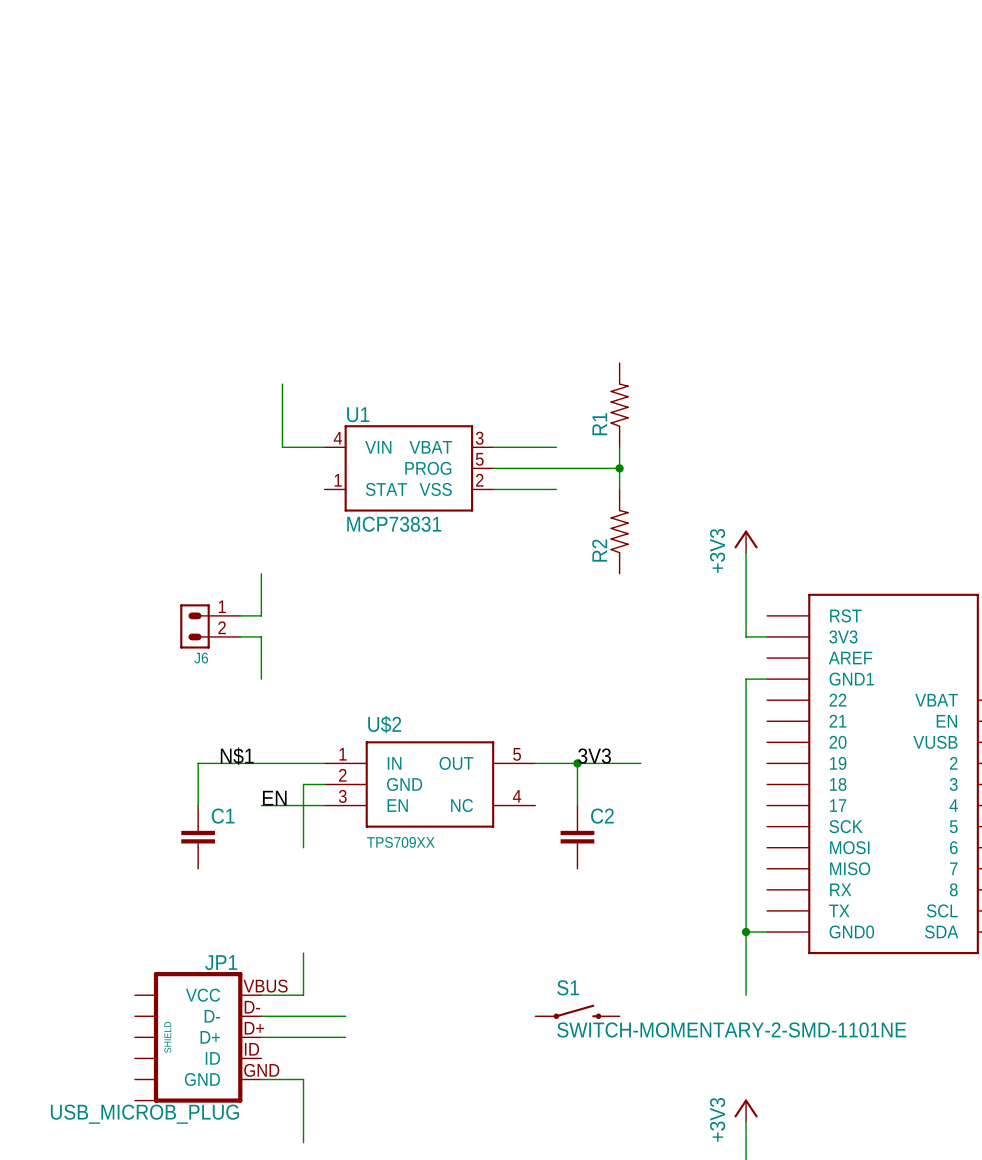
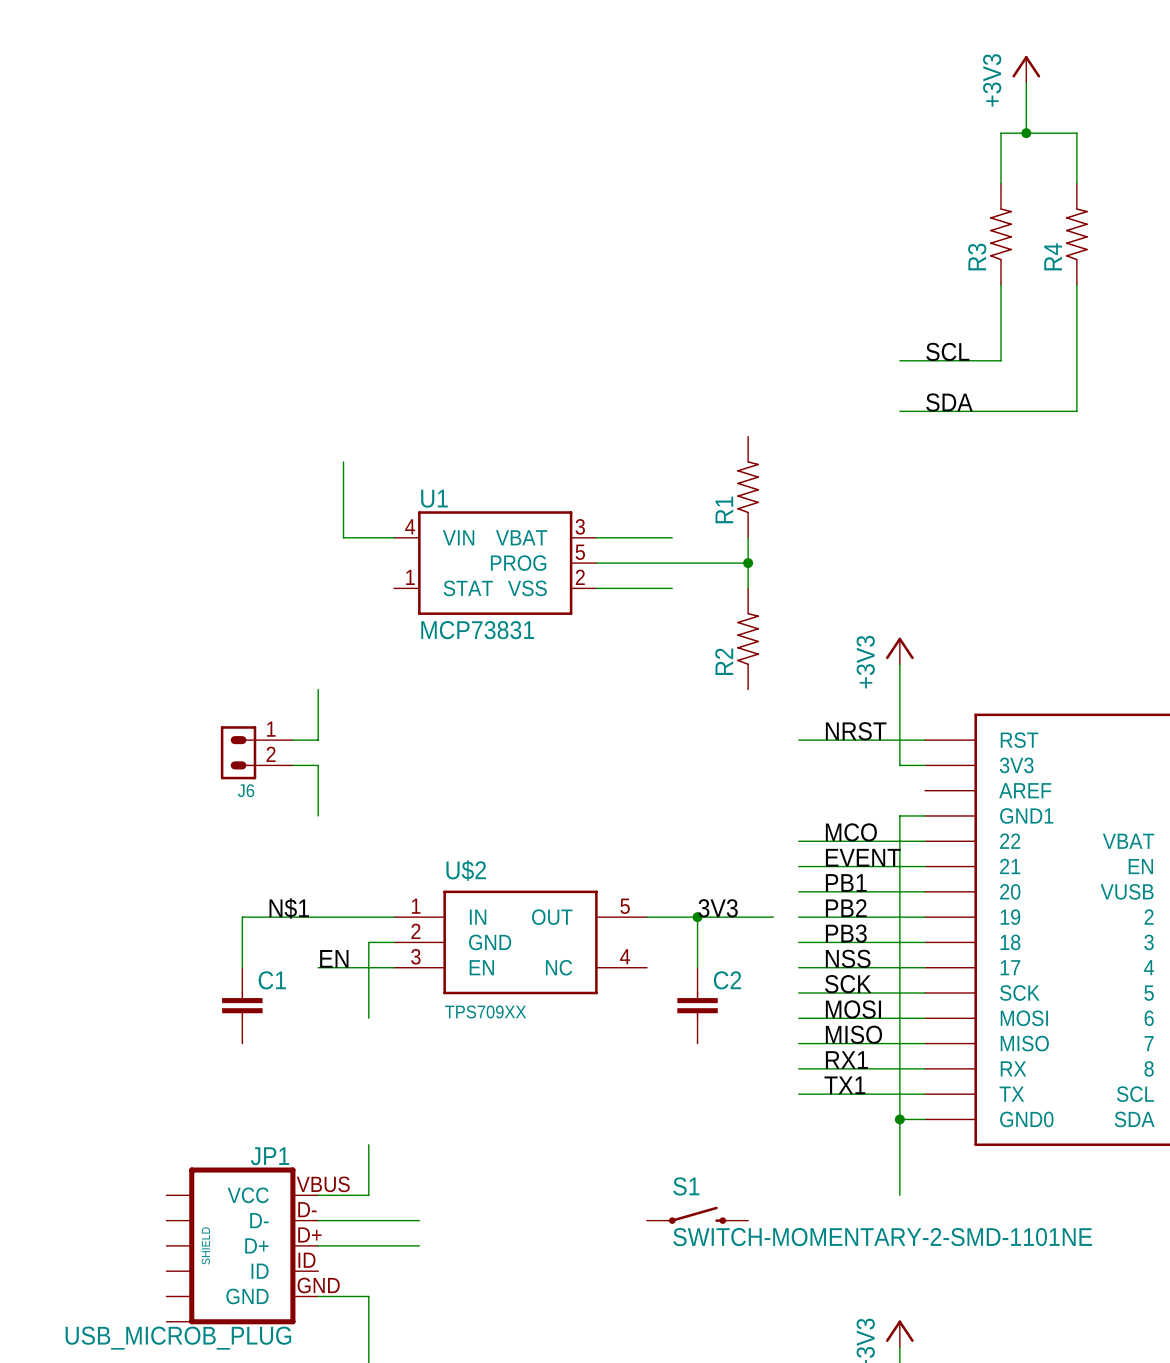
power symbol: none -> +3V3 (1026, 69)
wire: none -> (1026, 82) (1026, 133)
junction: none -> (1026, 133)
wire: none -> (1001, 183) (1001, 133) (1076, 133) (1076, 183)
R3: none -> (1001, 234)
R4: none -> (1076, 234)
wire: none -> (1001, 284) (1001, 360) (899, 360)
wire: none -> (1076, 284) (1076, 411) (899, 411)
label: none -> SCL (947, 351)
label: none -> SDA (949, 402)
label: none -> NRST (856, 731)
wire: none -> (798, 740) (925, 740)
label: none -> MCO (851, 832)
wire: none -> (798, 841) (925, 841)
label: none -> EVENT (863, 857)
wire: none -> (798, 866) (925, 866)
label: none -> PB1 (846, 883)
wire: none -> (798, 891) (925, 891)
label: none -> PB2 (846, 908)
wire: none -> (798, 917) (925, 917)
label: none -> PB3 (846, 933)
wire: none -> (798, 942) (925, 942)
label: none -> NSS (848, 958)
wire: none -> (798, 967) (925, 967)
label: none -> SCK (848, 984)
wire: none -> (798, 993) (925, 993)
label: none -> MOSI (853, 1009)
wire: none -> (798, 1018) (925, 1018)
label: none -> MISO (853, 1034)
wire: none -> (798, 1043) (925, 1043)
label: none -> RX1 (846, 1060)
wire: none -> (798, 1068) (925, 1068)
label: none -> TX1 (844, 1085)
wire: none -> (798, 1094) (925, 1094)

